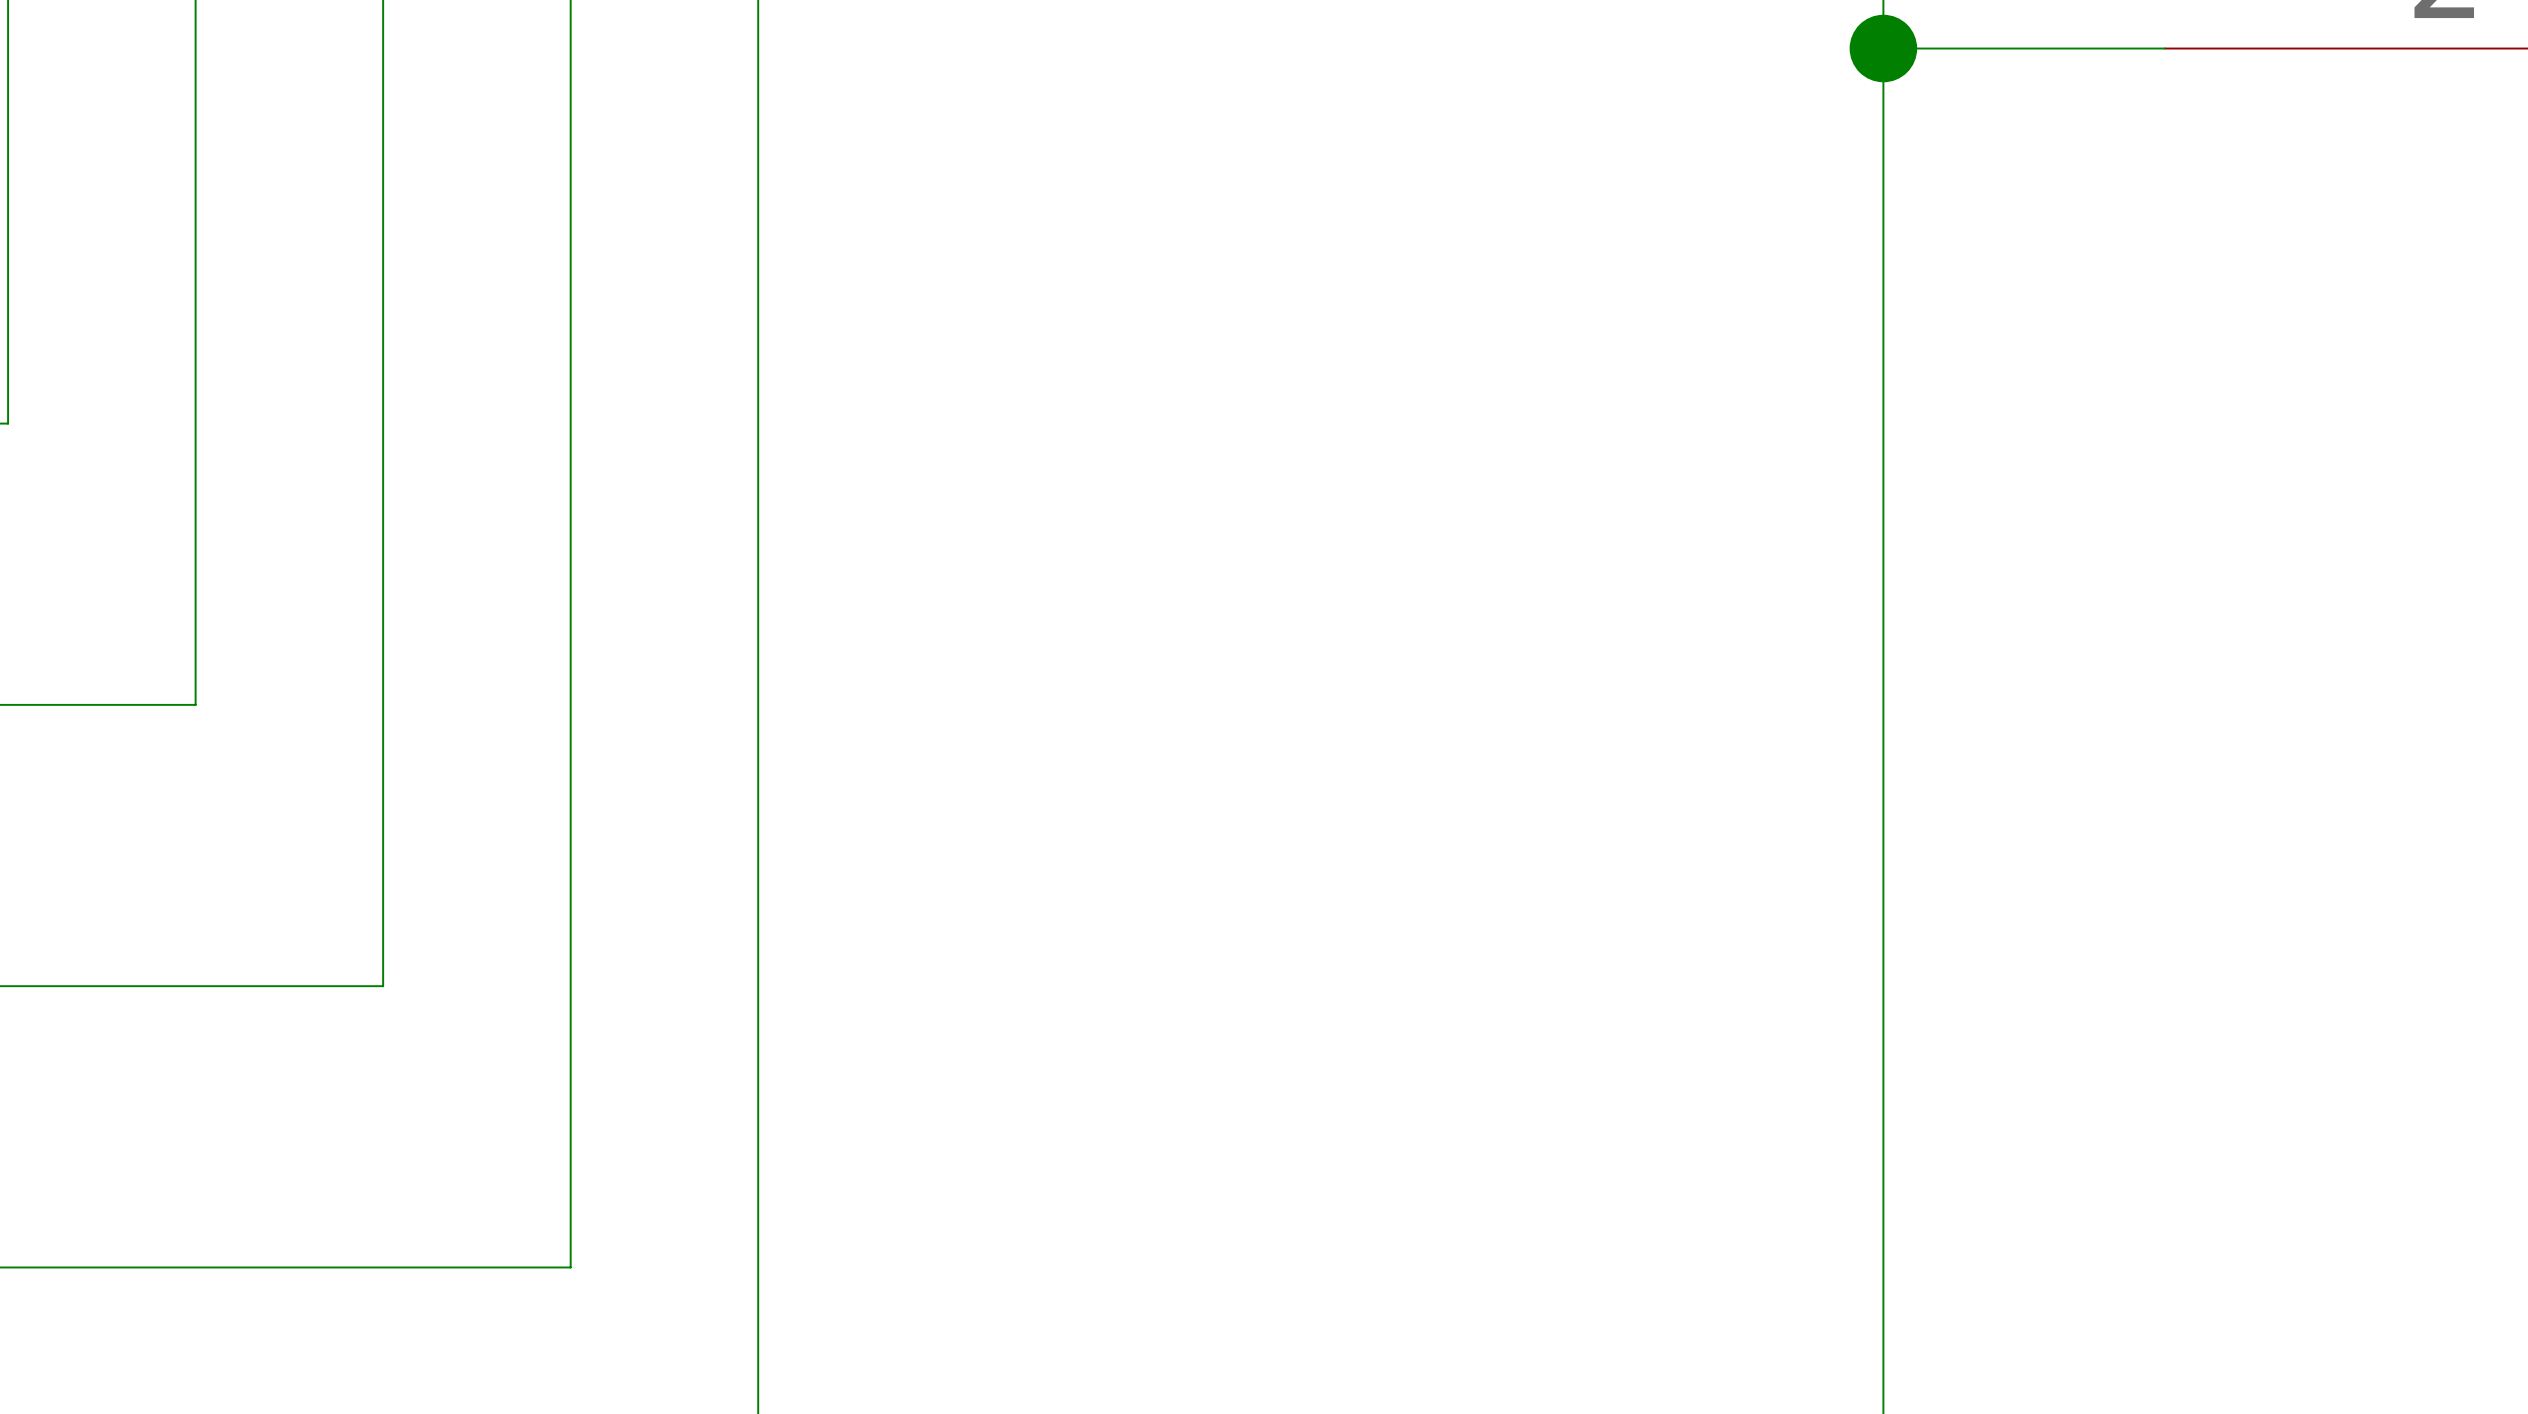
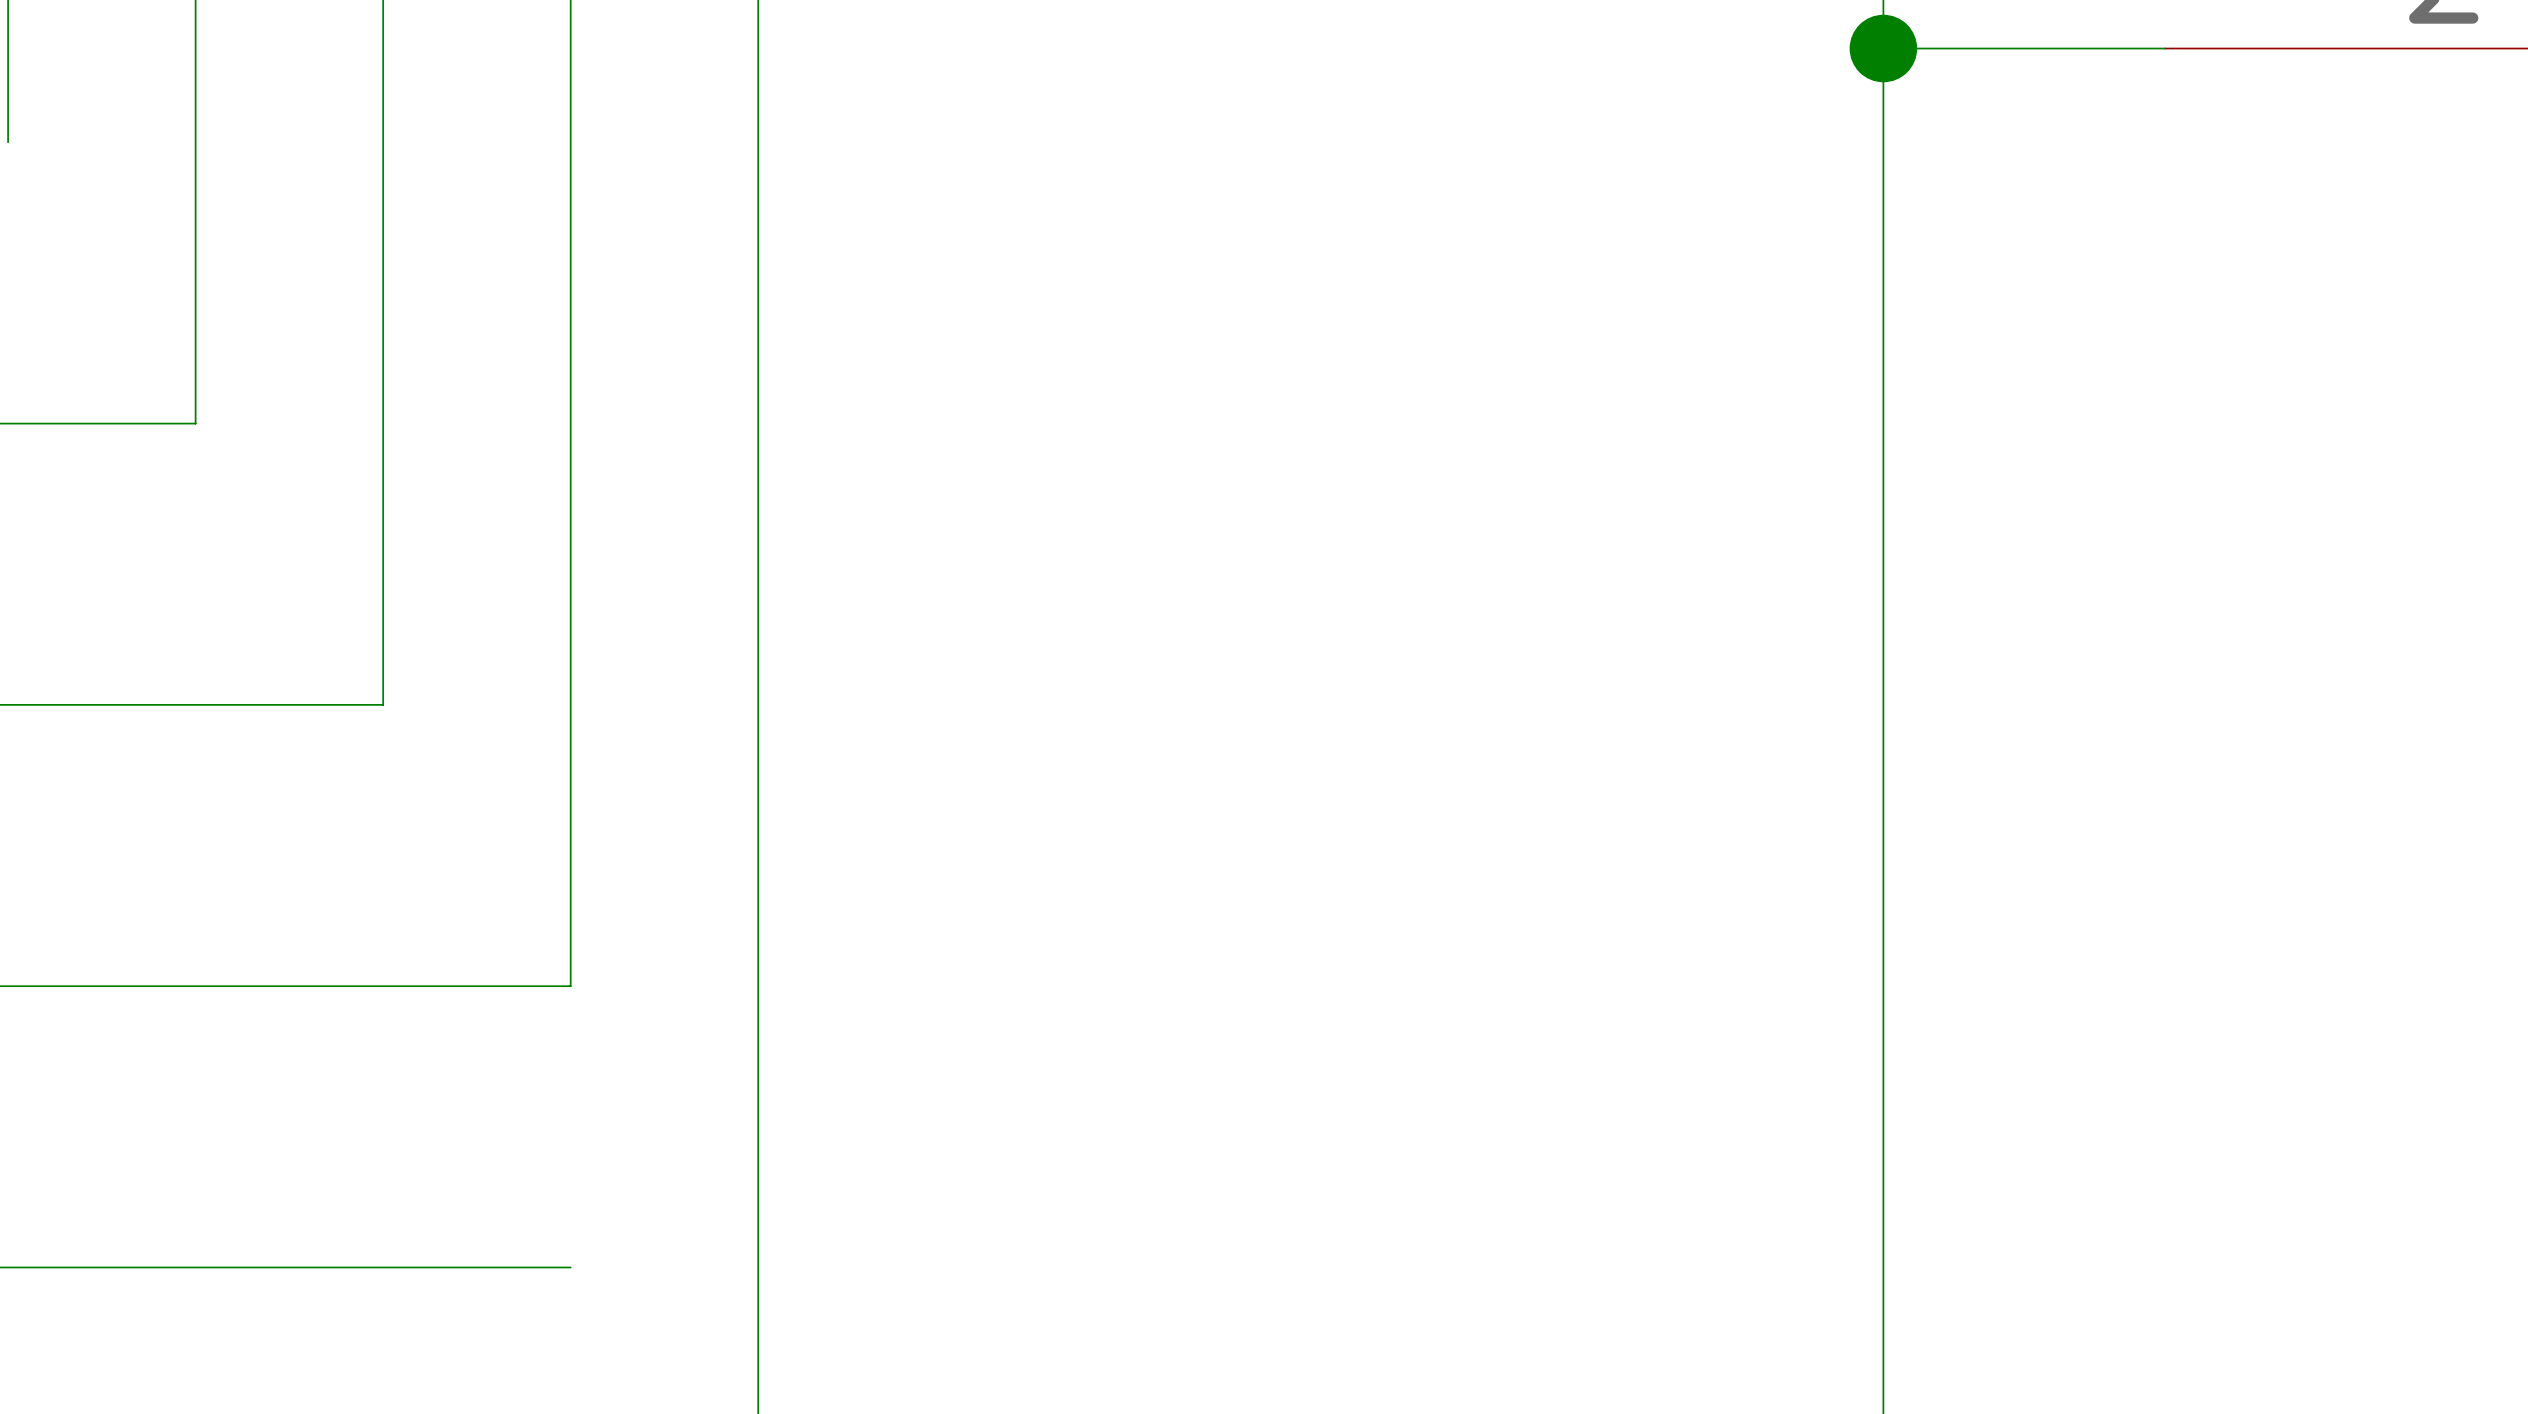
wire: (8, 142) (8, 423) -> (195, 423) (8, 423)
wire: (195, 423) (195, 704) -> (383, 704) (195, 704)
wire: (383, 704) (383, 986) -> (570, 986) (383, 986)
wire: (570, 986) (570, 1267) -> none

